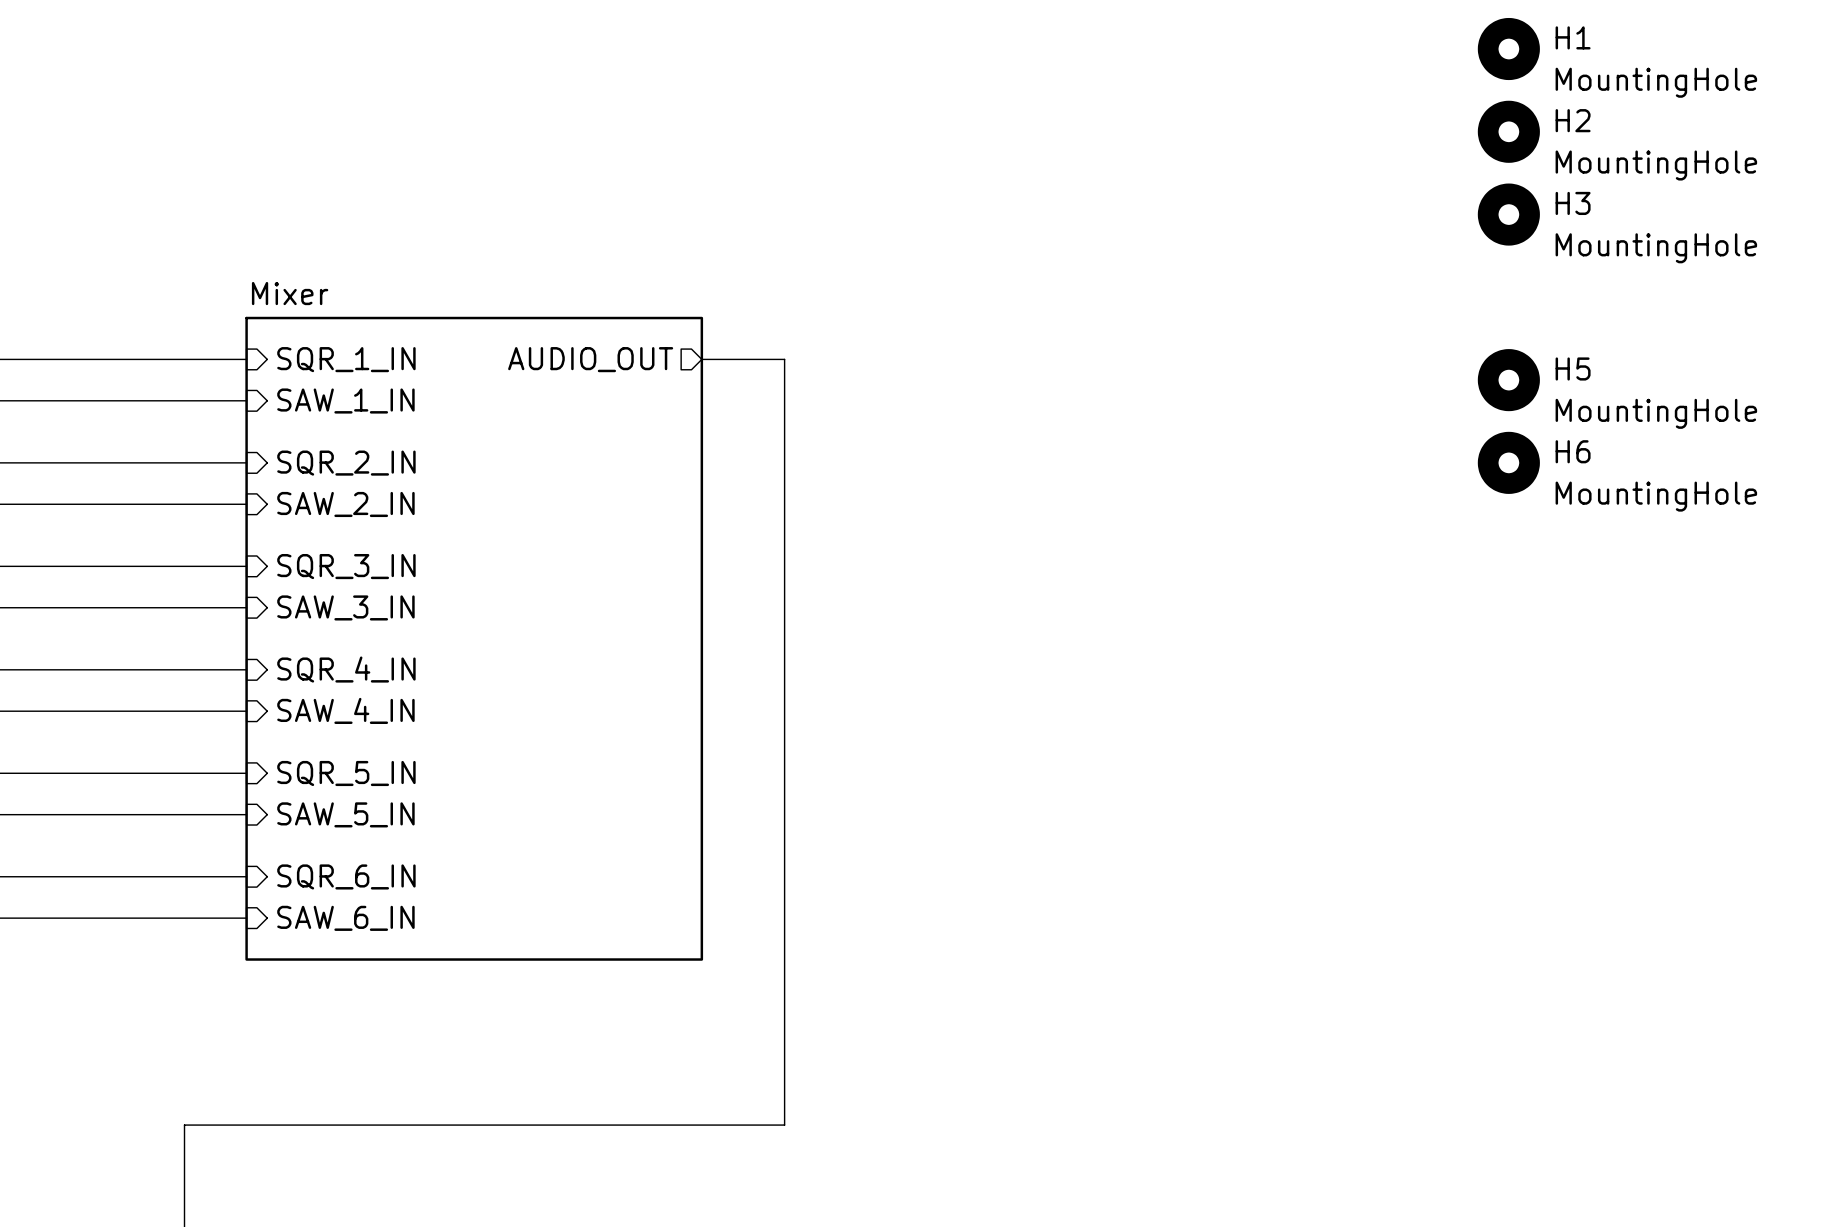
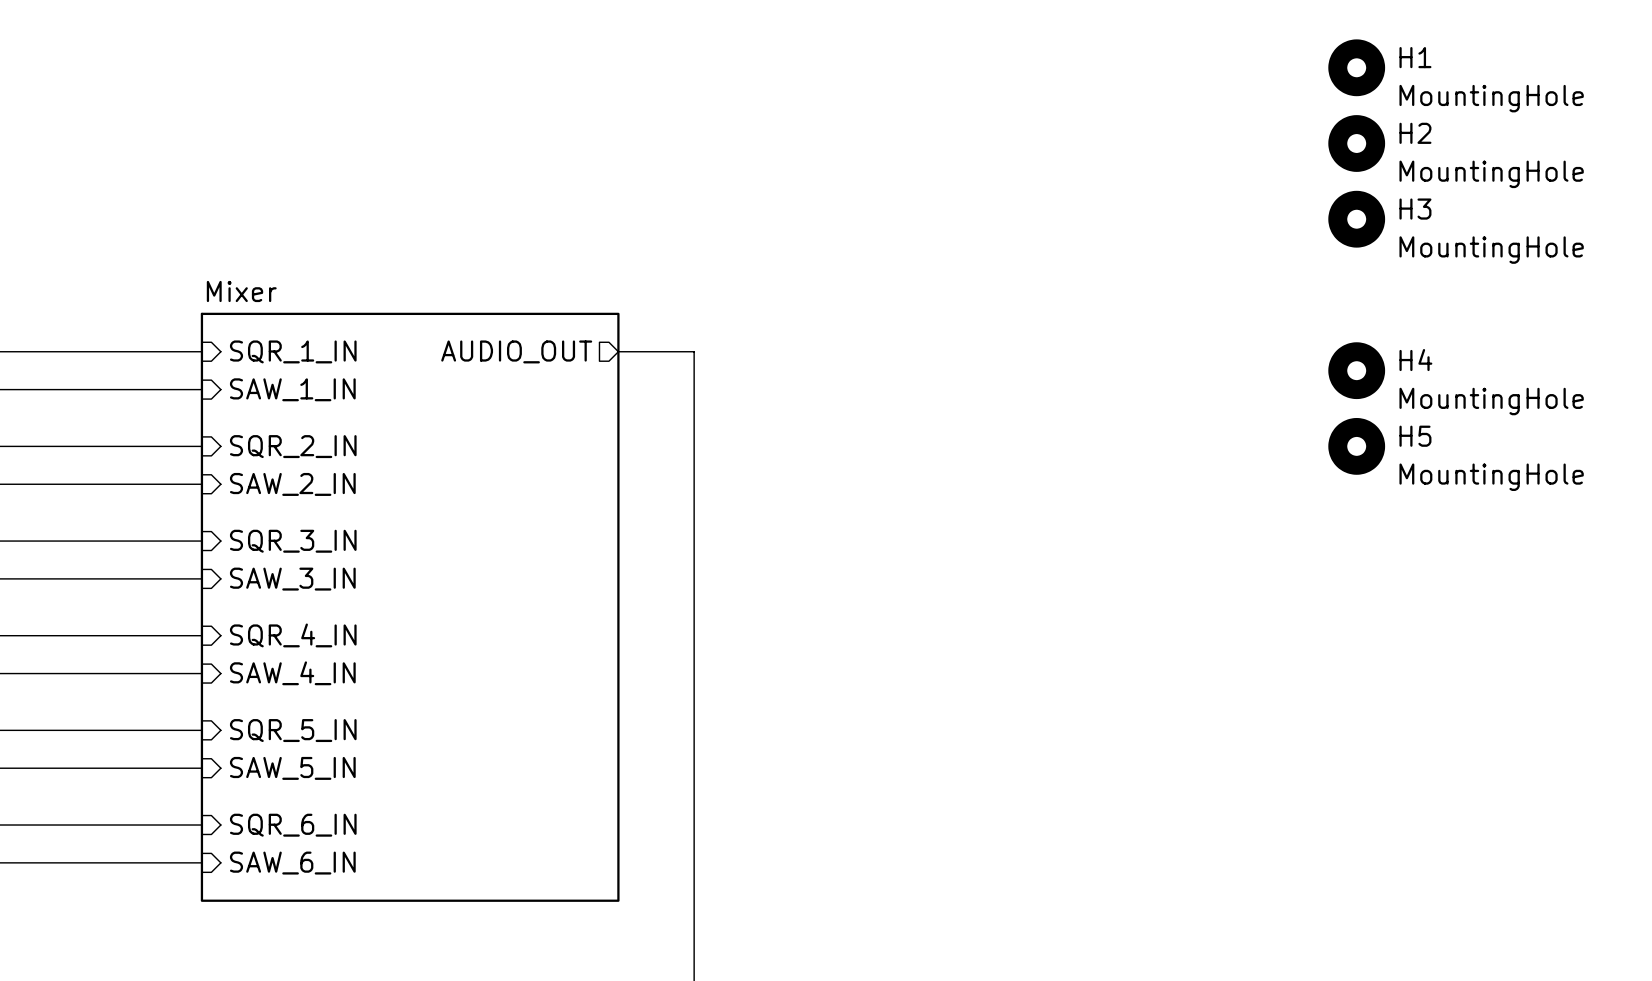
H5 name: H5 (1573, 368) -> H4 (1415, 360)
H6 name: H6 (1573, 451) -> H5 (1415, 436)

